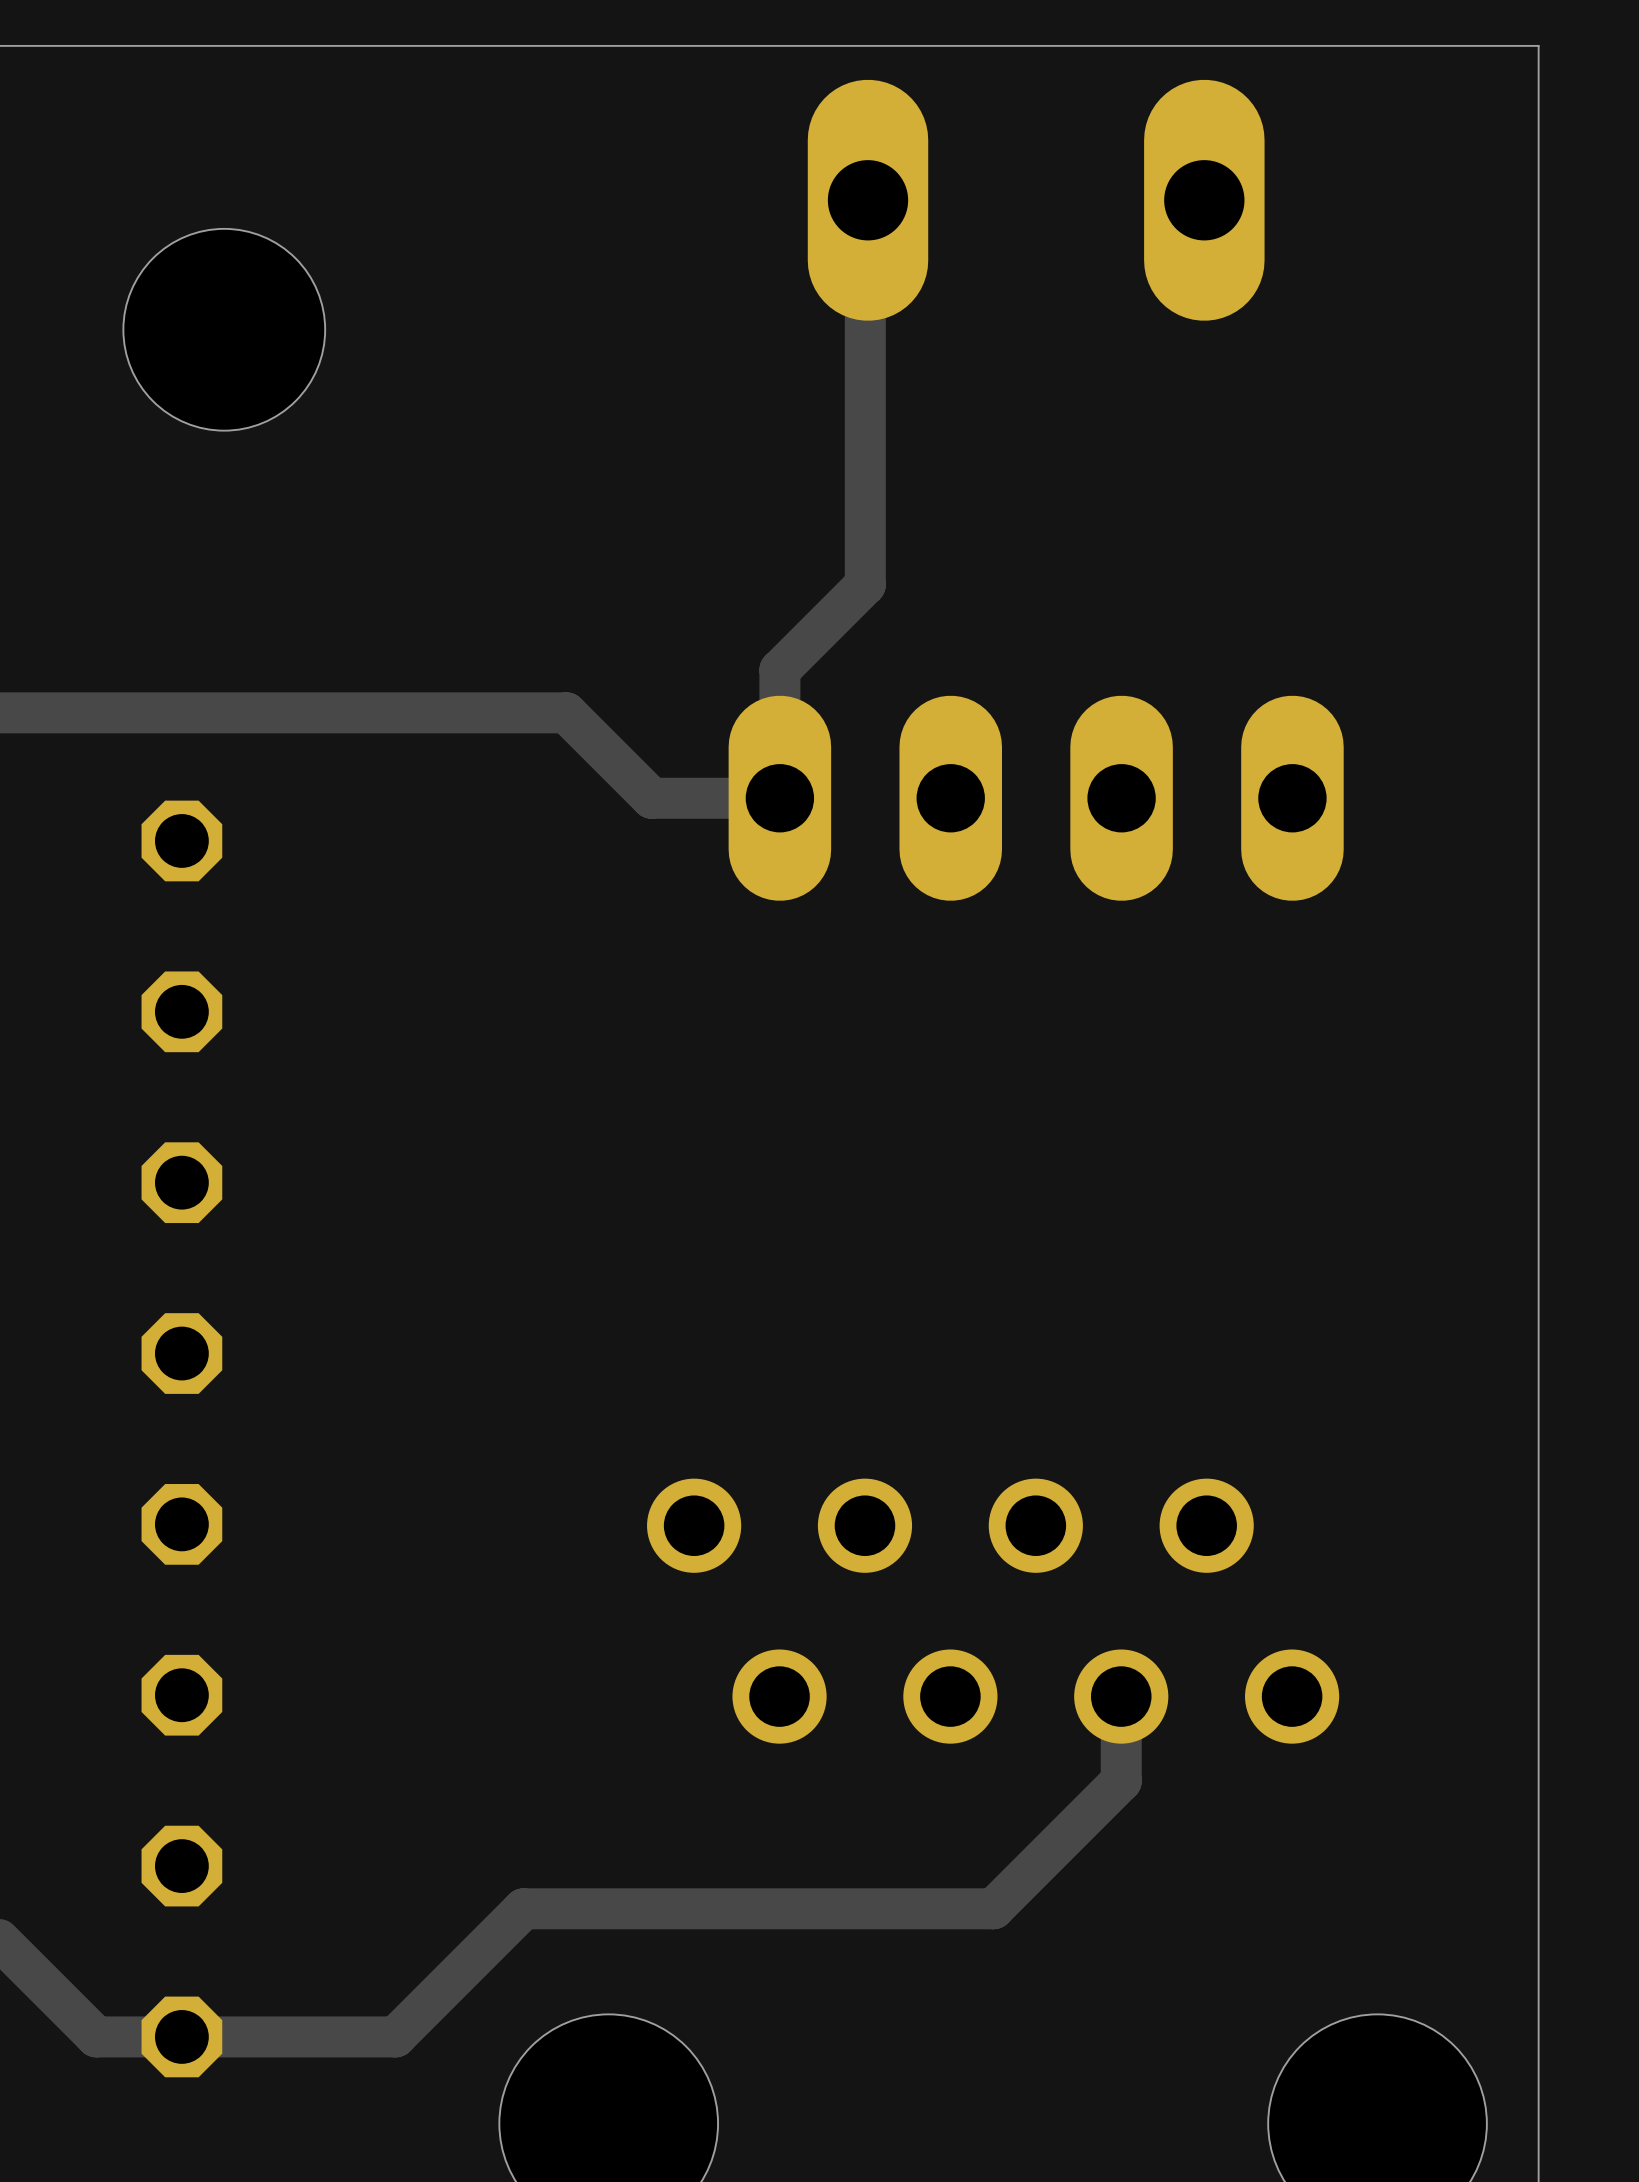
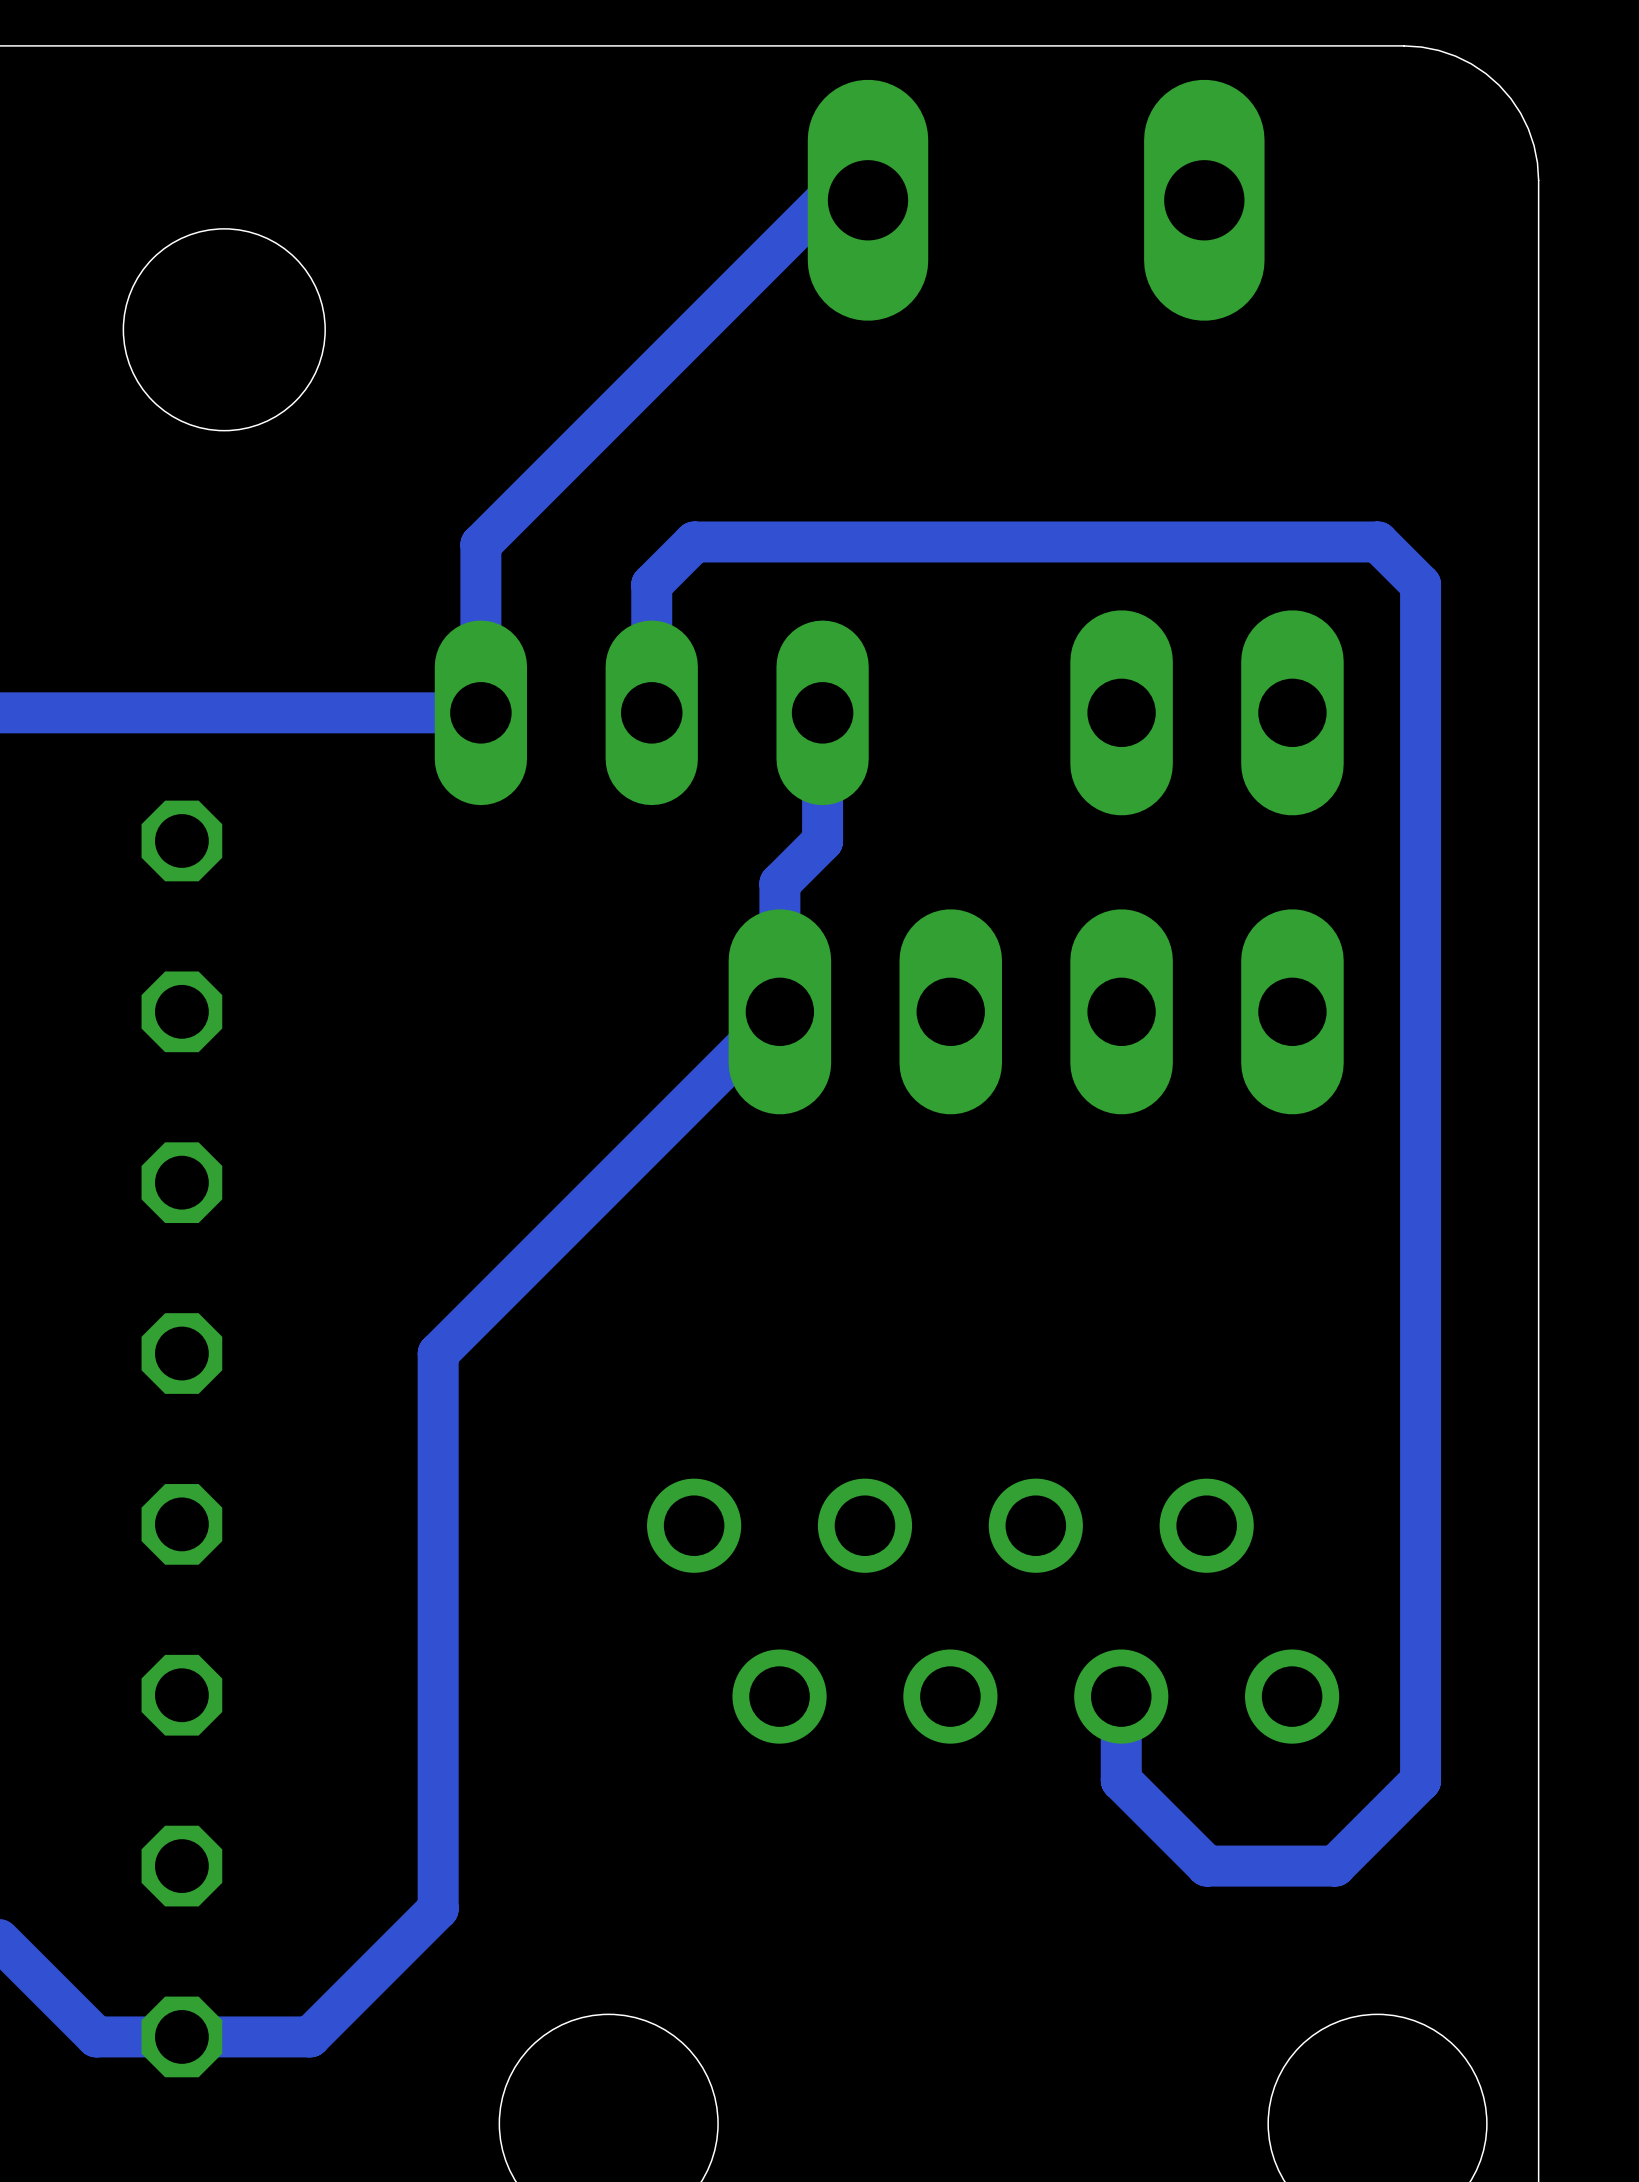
board edge: (1404, 45) (1538, 45) (1538, 180) -> (1404, 45) (1438, 50) (1455, 56) (1471, 63) (1499, 85) (1520, 113) (1528, 128) (1534, 145) (1538, 180)
track: (865, 202) (865, 584) (779, 670) (779, 798) (651, 798) (566, 712) (480, 712) -> (868, 200) (825, 200) (480, 544) (480, 712)
track: none -> (651, 712) (651, 584) (694, 541) (1377, 541) (1420, 584) (1420, 1780) (1335, 1866) (1207, 1866) (1121, 1780)
part: none -> (651, 712)
part: none -> (1207, 712)
part position: (1036, 798) -> (1036, 1011)
track: (1121, 1781) (993, 1908) (523, 1908) (395, 2036) (310, 2036) -> (822, 712) (822, 840) (779, 883) (779, 1011) (438, 1353) (438, 1908) (310, 2036)

